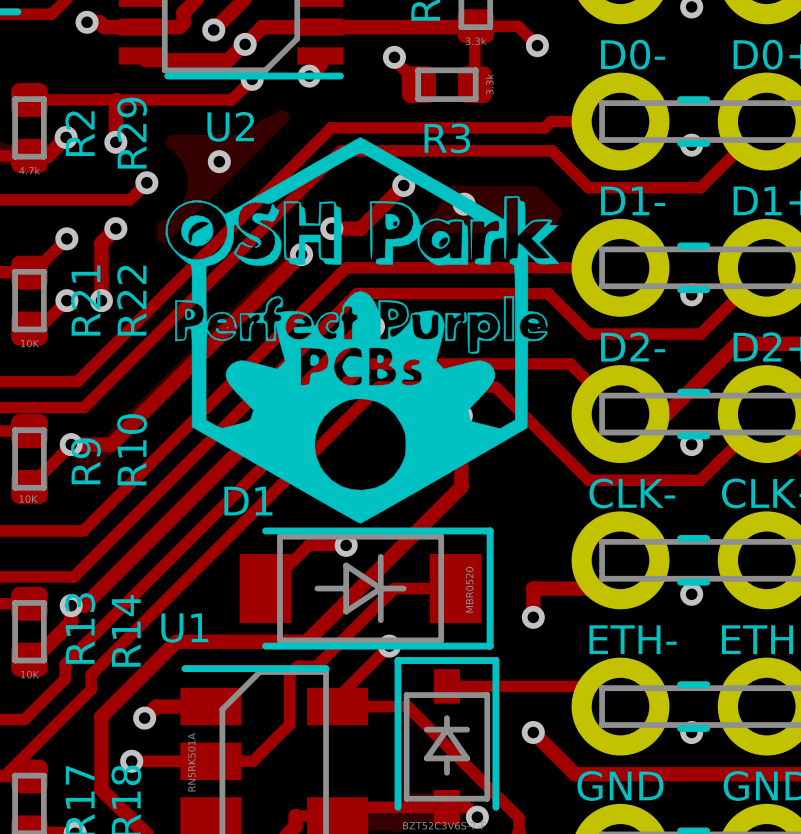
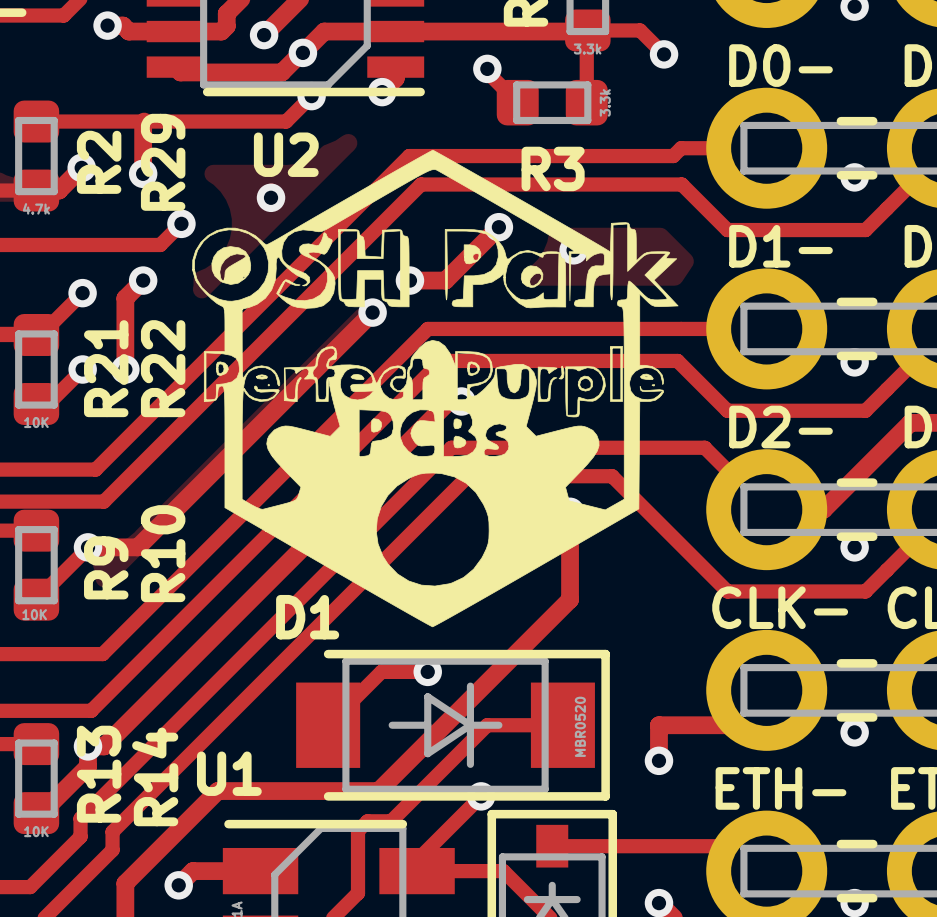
drawing position: (362, 330) -> (435, 388)

